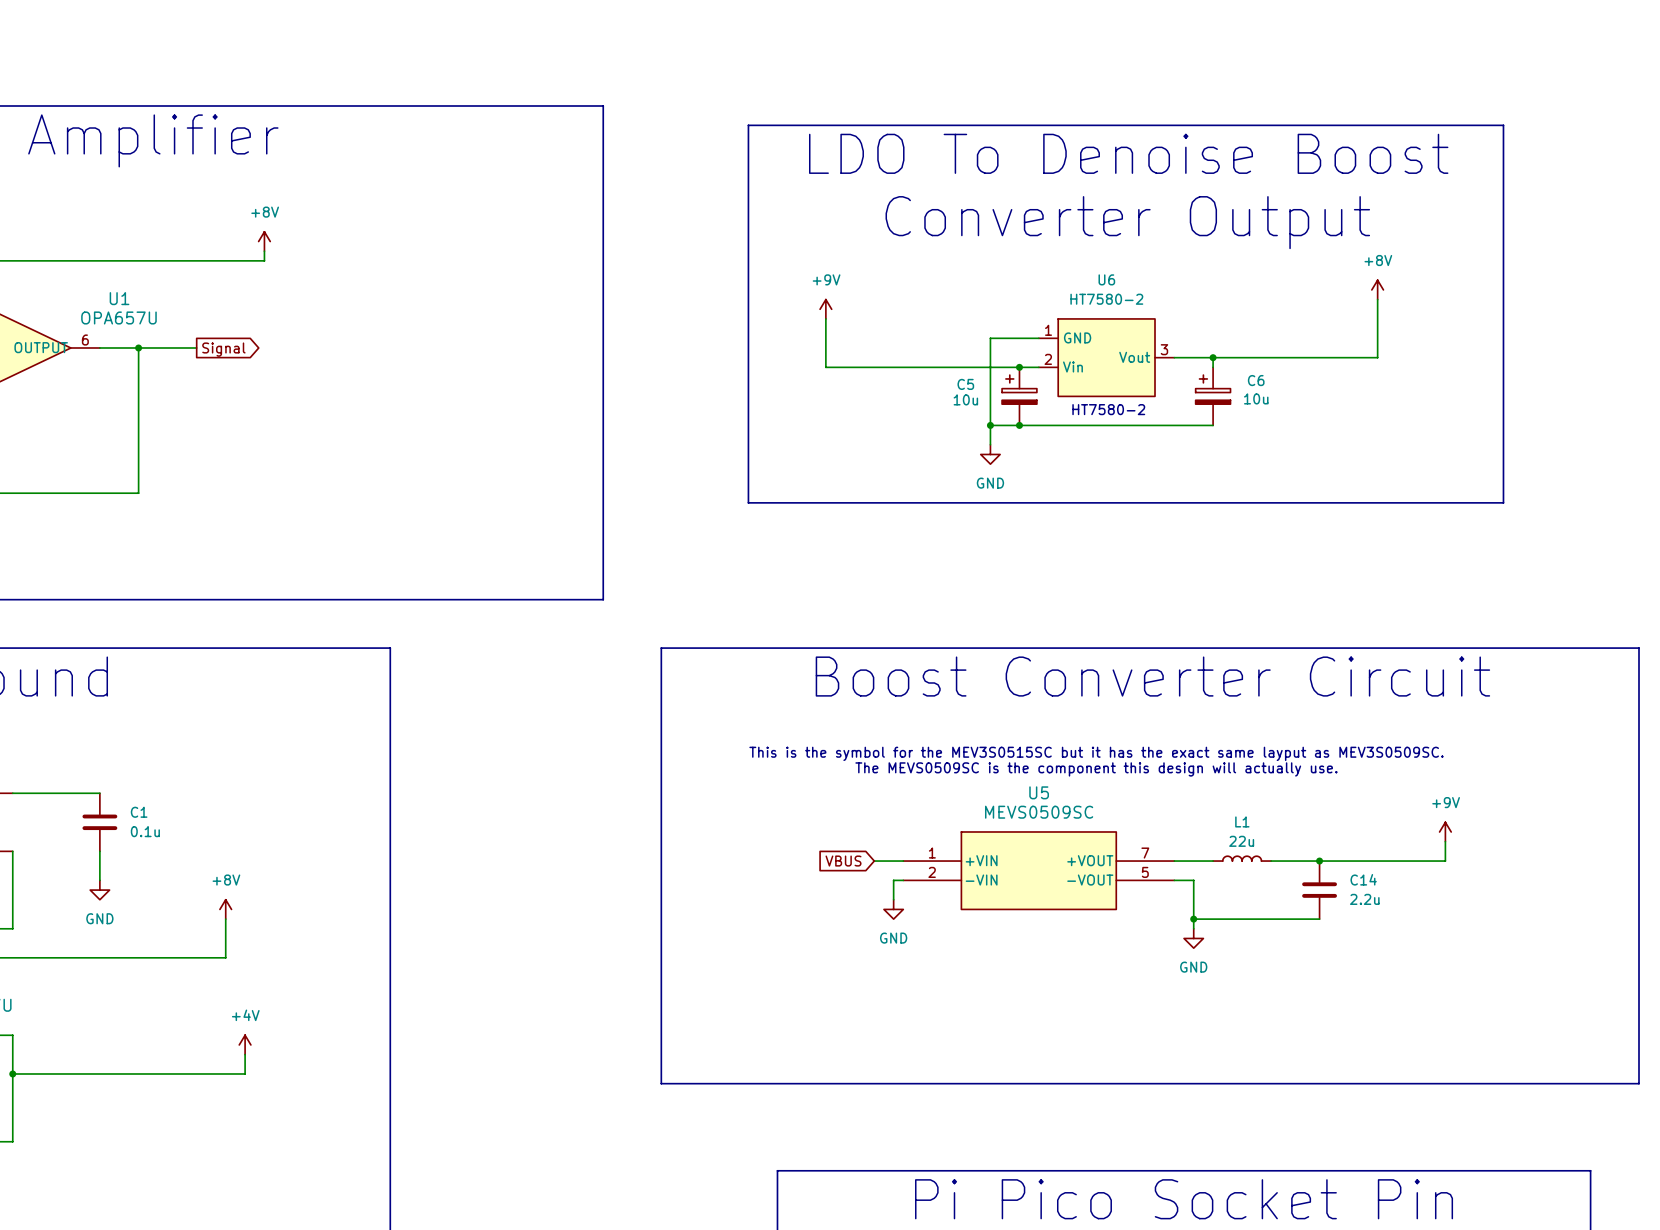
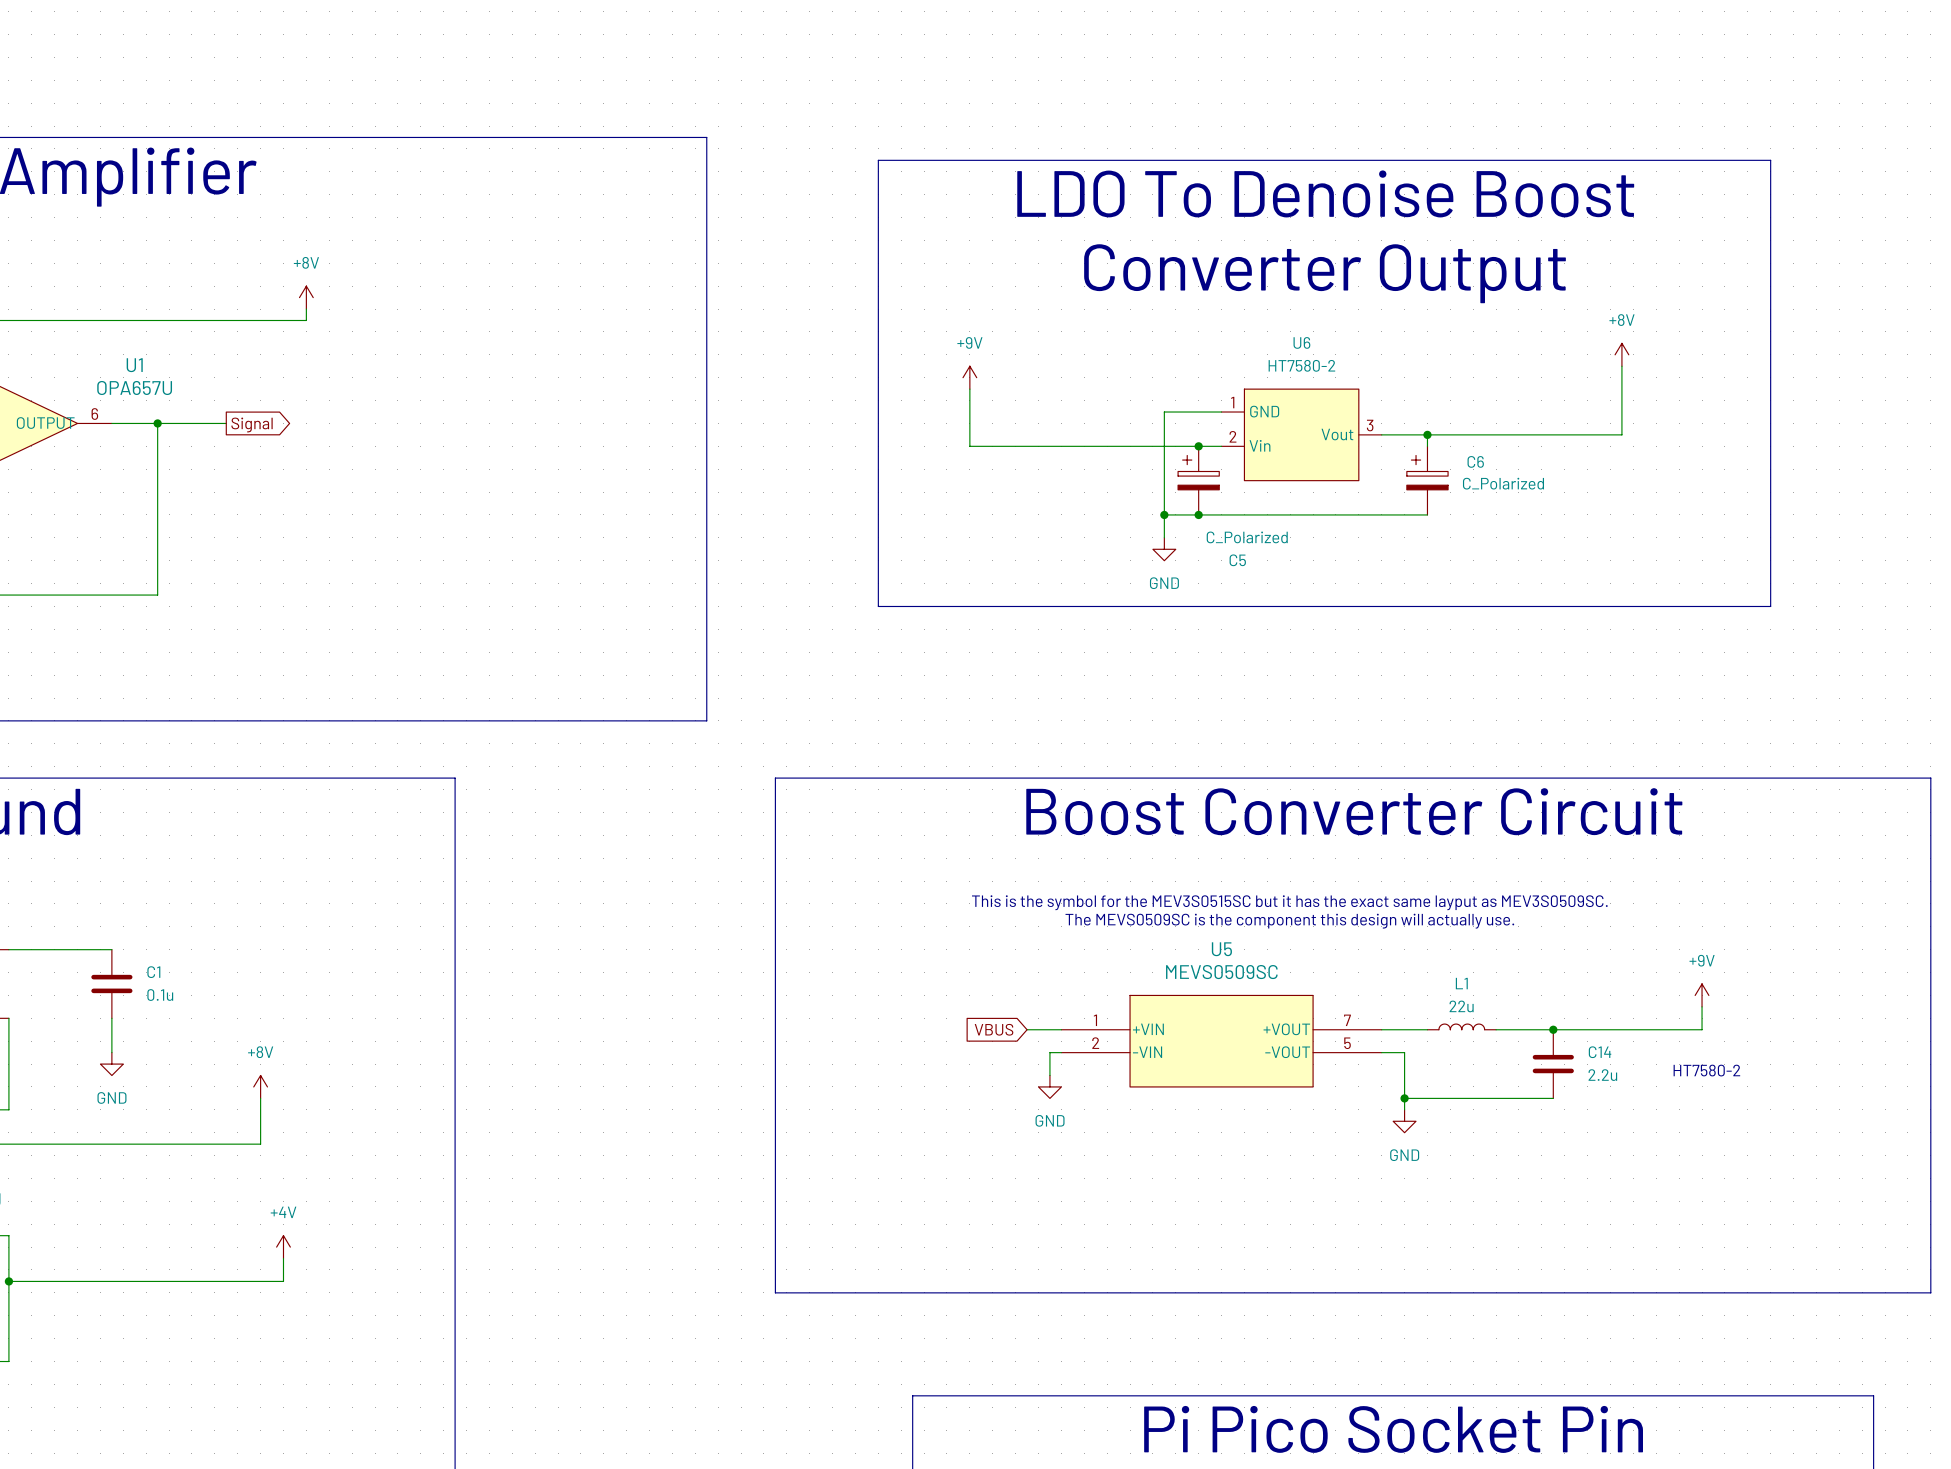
C5 name position: C5 (965, 384) -> C5 (1237, 560)
C6 value: 10u (1256, 398) -> C_Polarized (1503, 483)
C5 value: 10u (965, 399) -> C_Polarized (1247, 537)
text: HT7580-2 (1108, 409) -> none
text: none -> HT7580-2 (1706, 1070)

